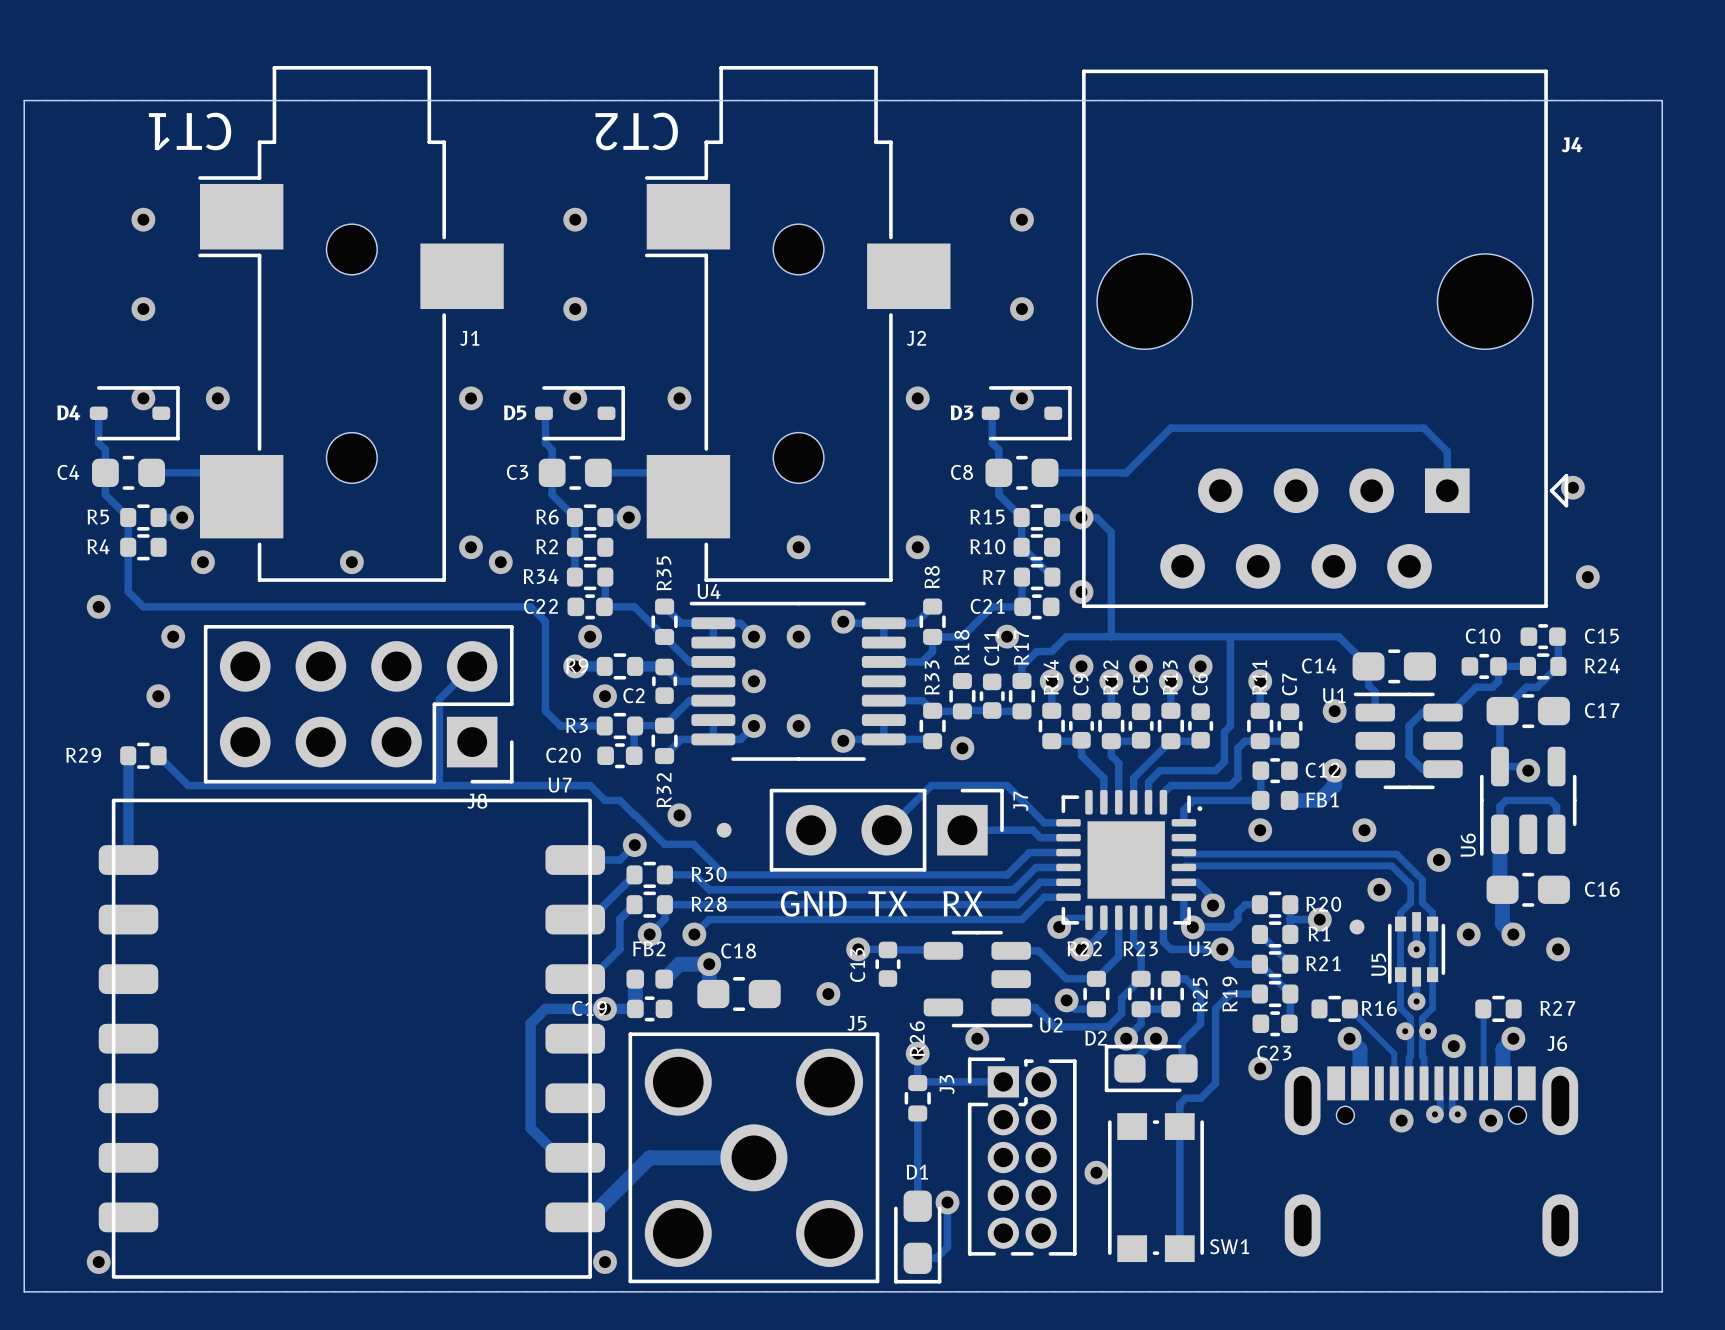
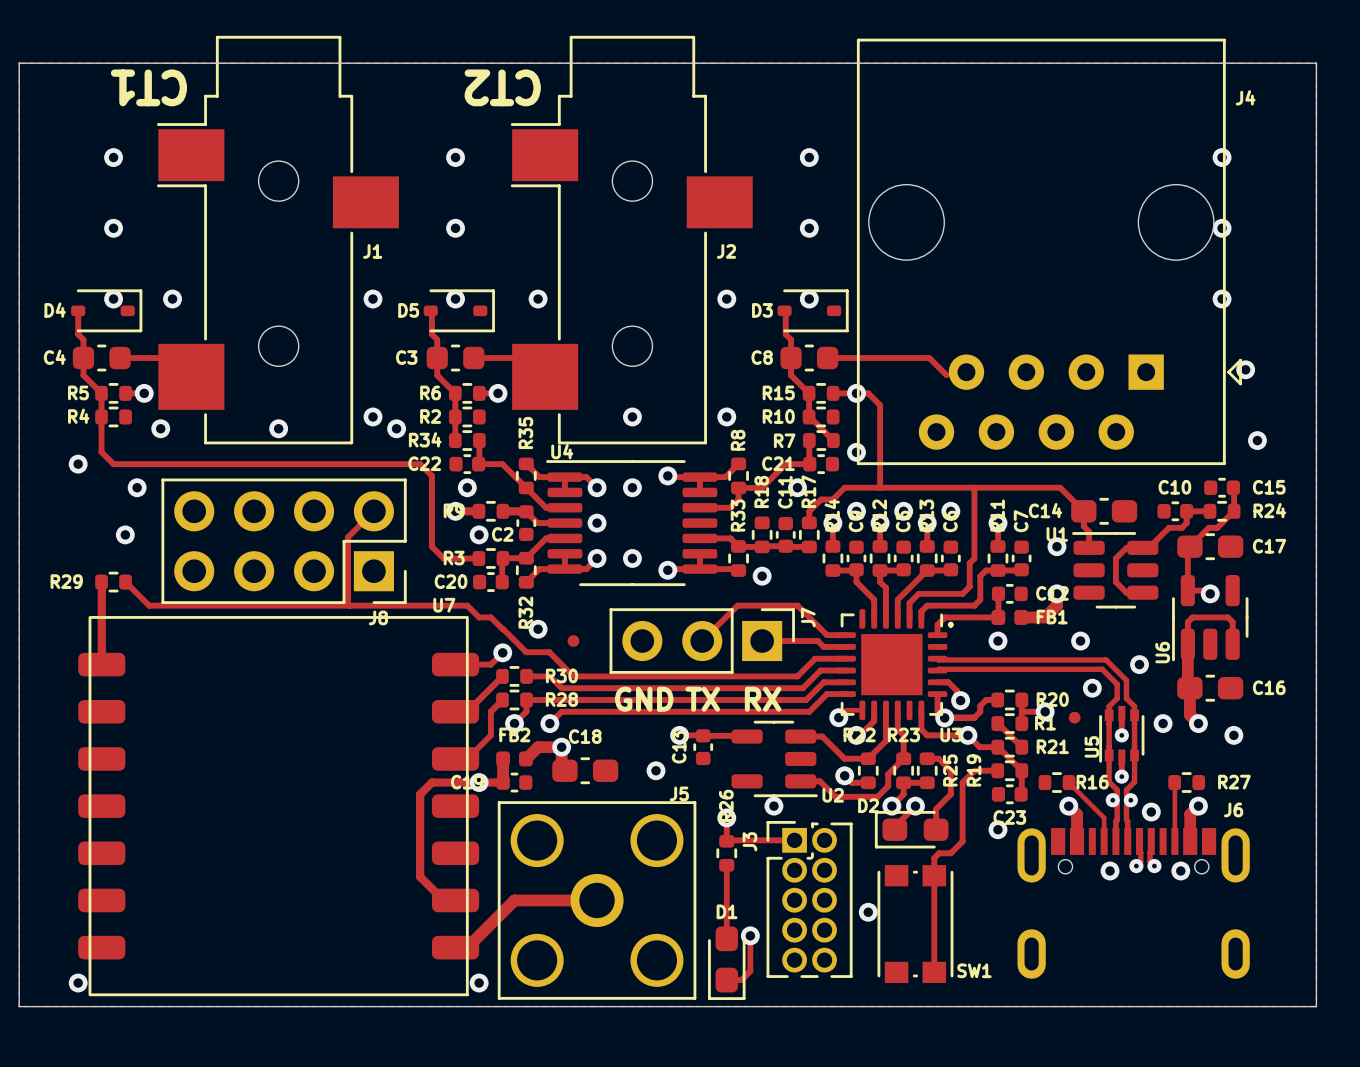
via: none -> (1222, 157)
via: none -> (1222, 228)
via: none -> (1222, 299)
track: (1126, 472) (1170, 428) (1424, 428) (1447, 451) (1447, 490) -> (891, 358) (929, 358) (946, 375)

